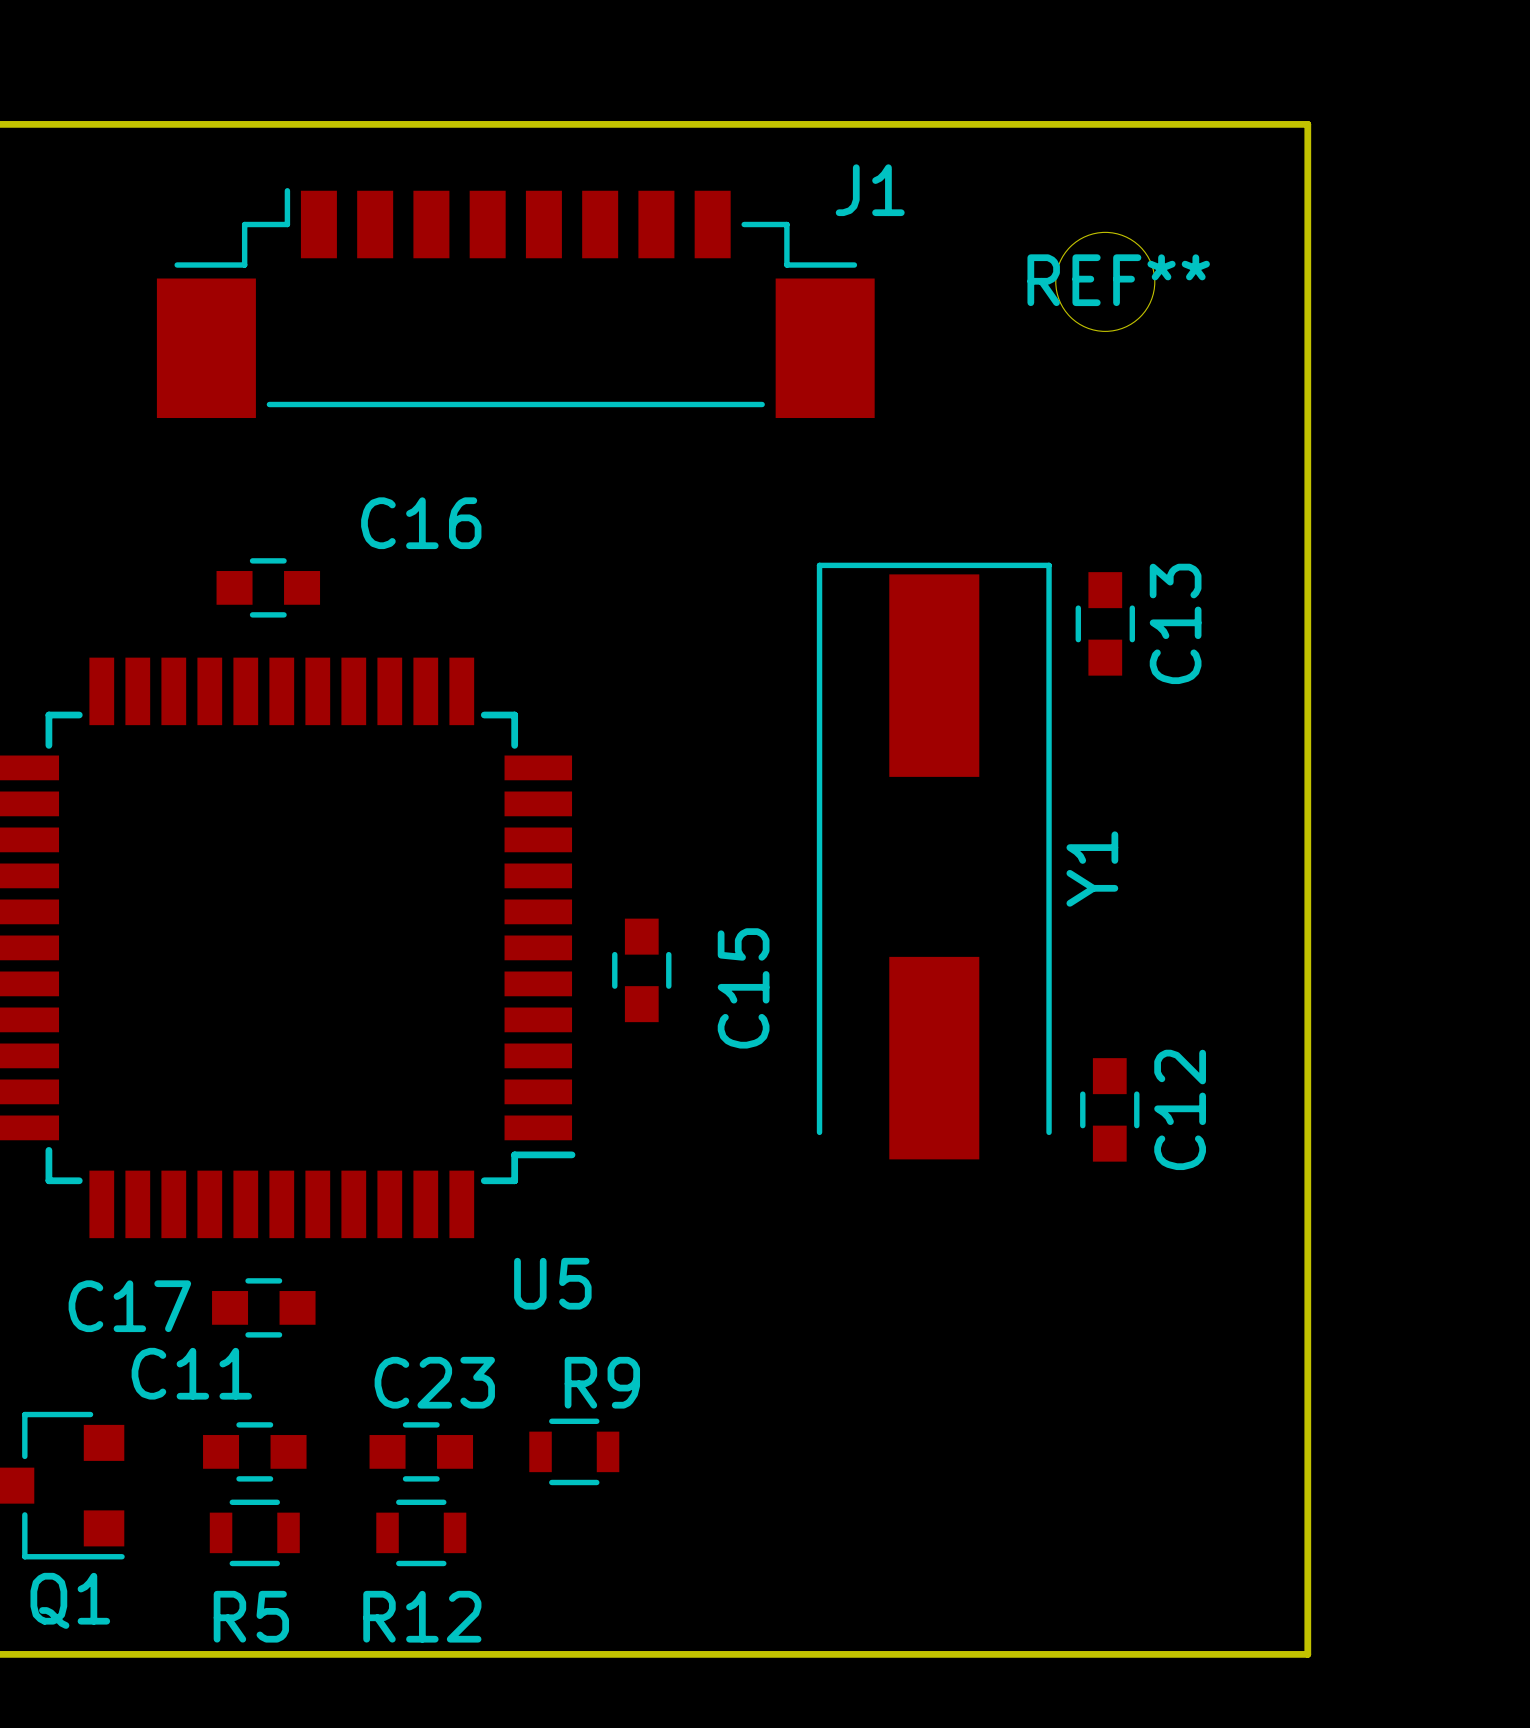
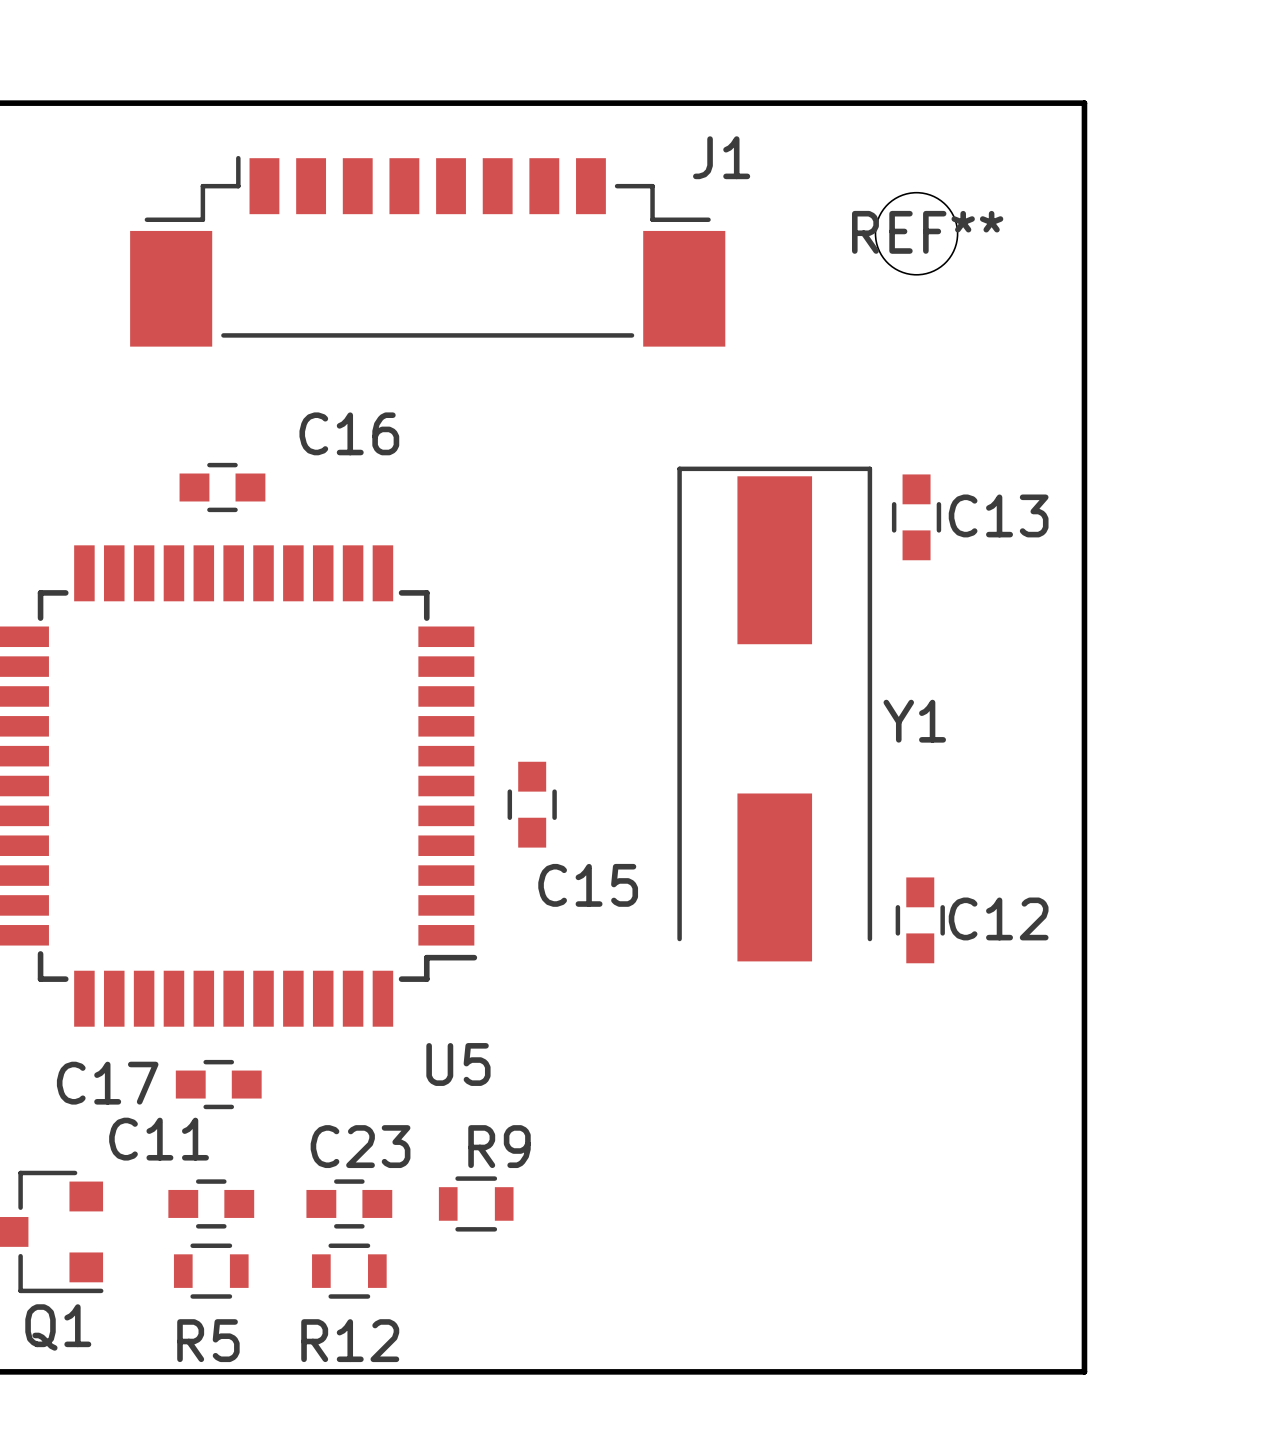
C13 name rotation: 0° (1175, 623) -> 90° clockwise (998, 515)
Y1 name rotation: 0° (1092, 869) -> 90° clockwise (914, 721)
C15 name rotation: 0° (743, 988) -> 90° clockwise (588, 885)
C12 name rotation: 0° (1180, 1109) -> 90° clockwise (998, 918)

